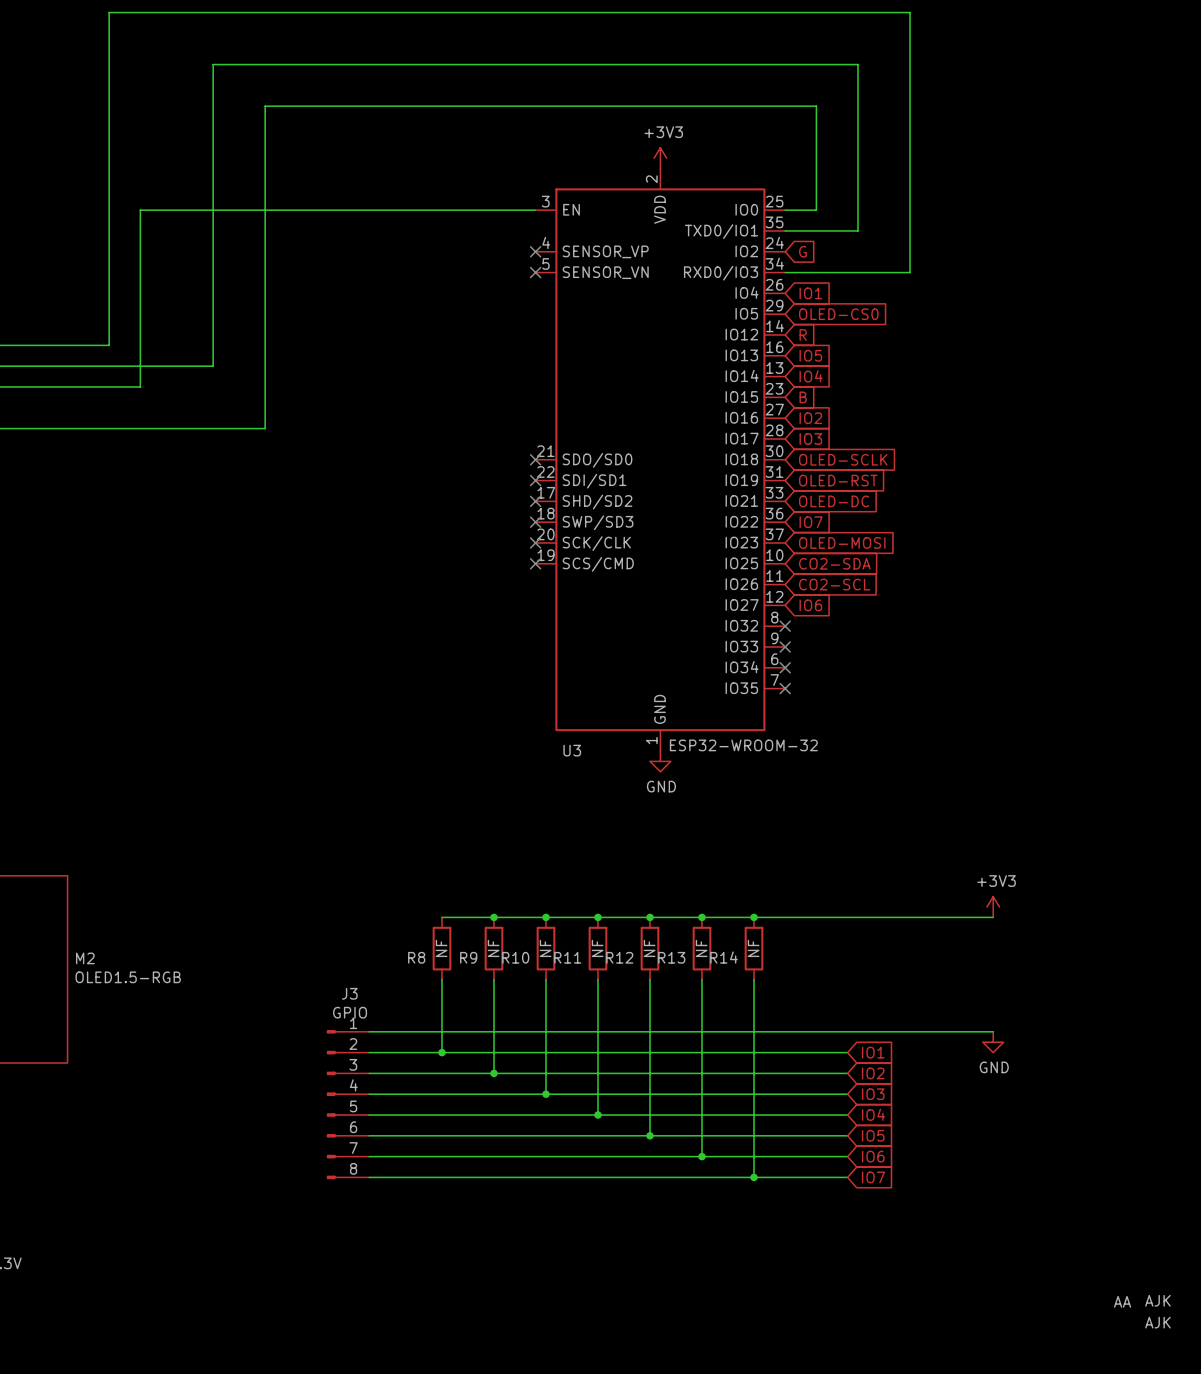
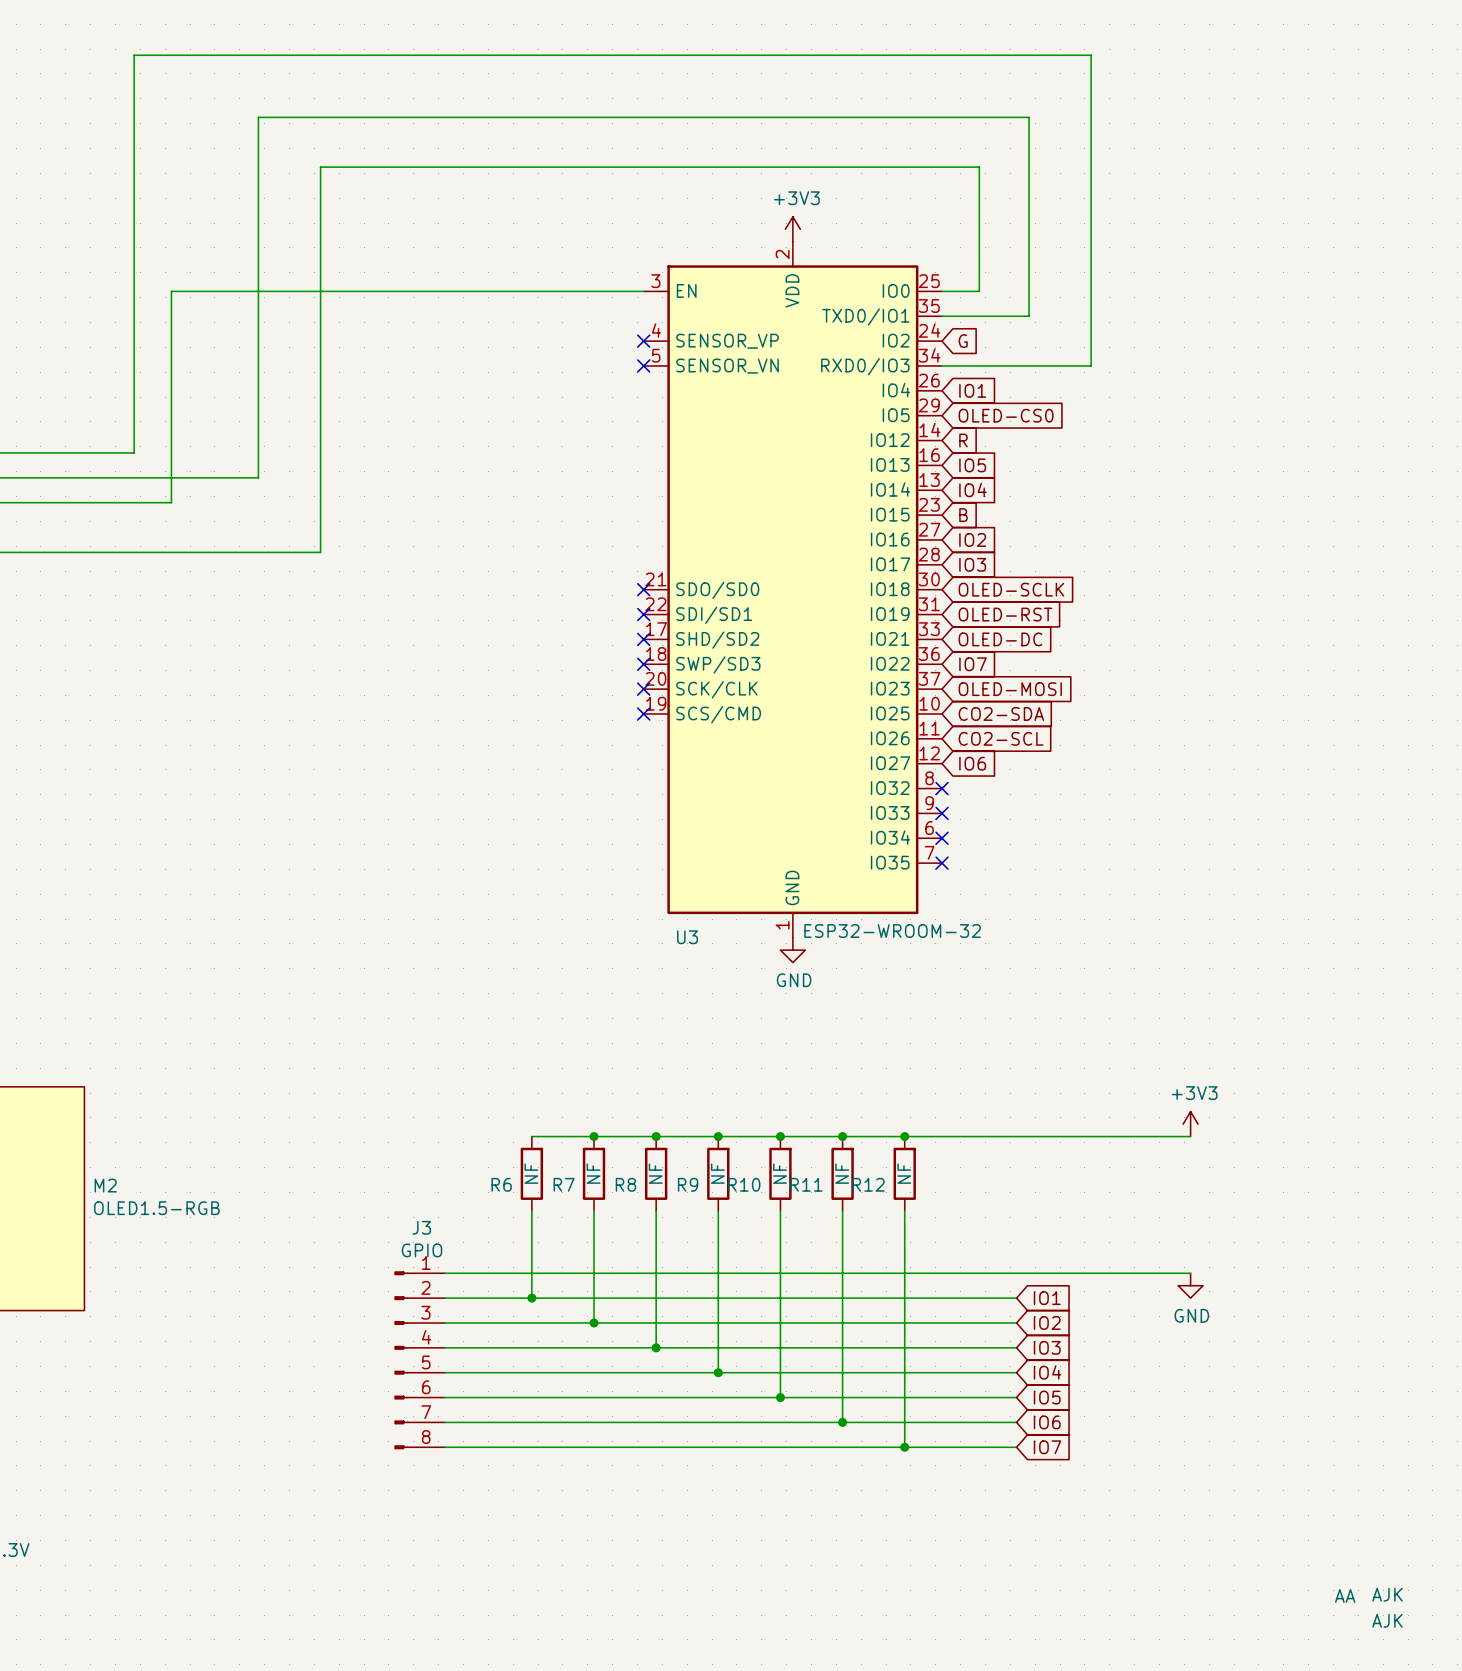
R8 name: R8 (416, 957) -> R6 (501, 1184)
R9 name: R9 (468, 957) -> R7 (564, 1184)
R10 name: R10 (515, 957) -> R8 (625, 1184)
R11 name: R11 (567, 957) -> R9 (688, 1184)
R12 name: R12 (619, 957) -> R10 (744, 1184)
R13 name: R13 (671, 957) -> R11 (806, 1184)
R14 name: R14 (724, 957) -> R12 (868, 1184)

